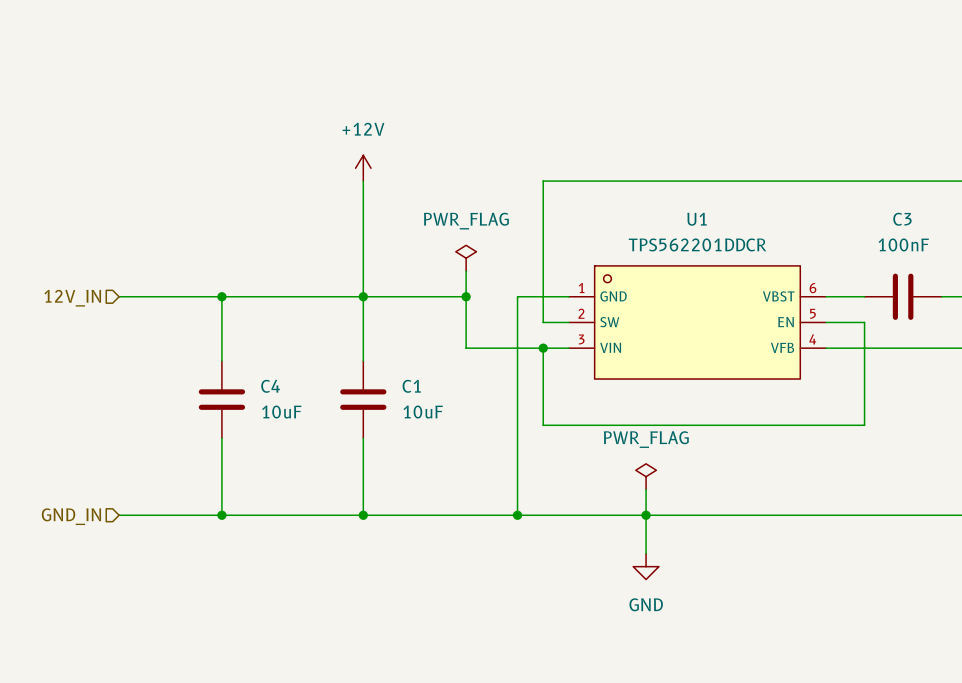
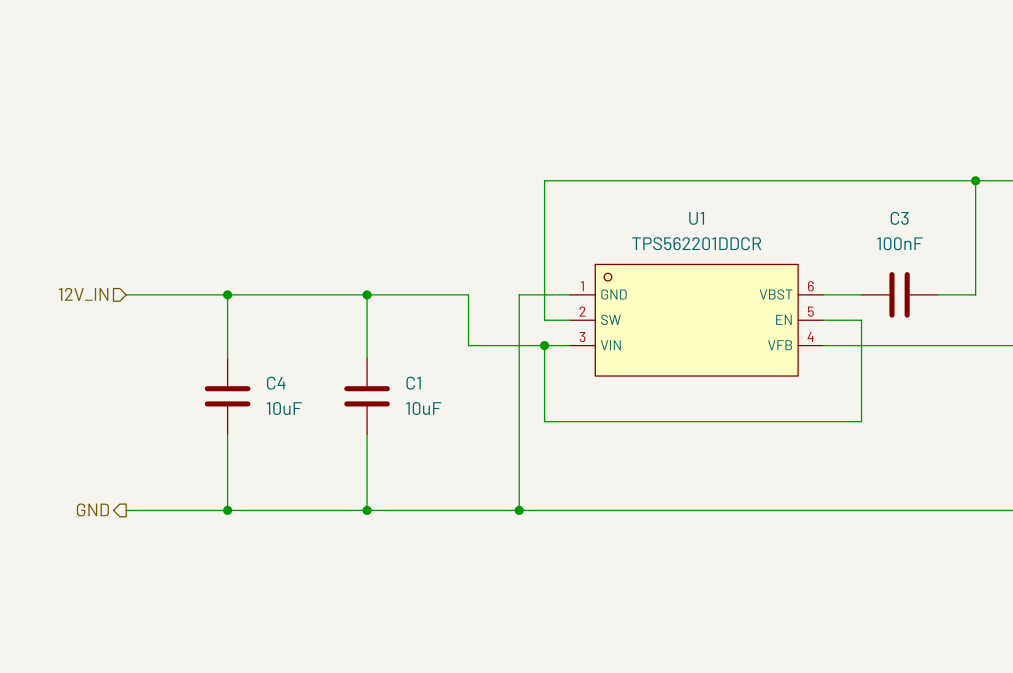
power symbol: +12V (363, 168) -> none
wire: (363, 181) (363, 296) -> none
power symbol: PWR_FLAG (466, 258) -> none
wire: (466, 271) (466, 296) -> none
junction: (466, 296) -> none
power symbol: PWR_FLAG (646, 476) -> none
wire: (646, 489) (646, 553) -> none
junction: (646, 515) -> none
hierarchical label shape: input (71, 516) -> output (92, 509)
hierarchical label: GND_IN (71, 516) -> GND (92, 509)
power symbol: GND (646, 566) -> none

